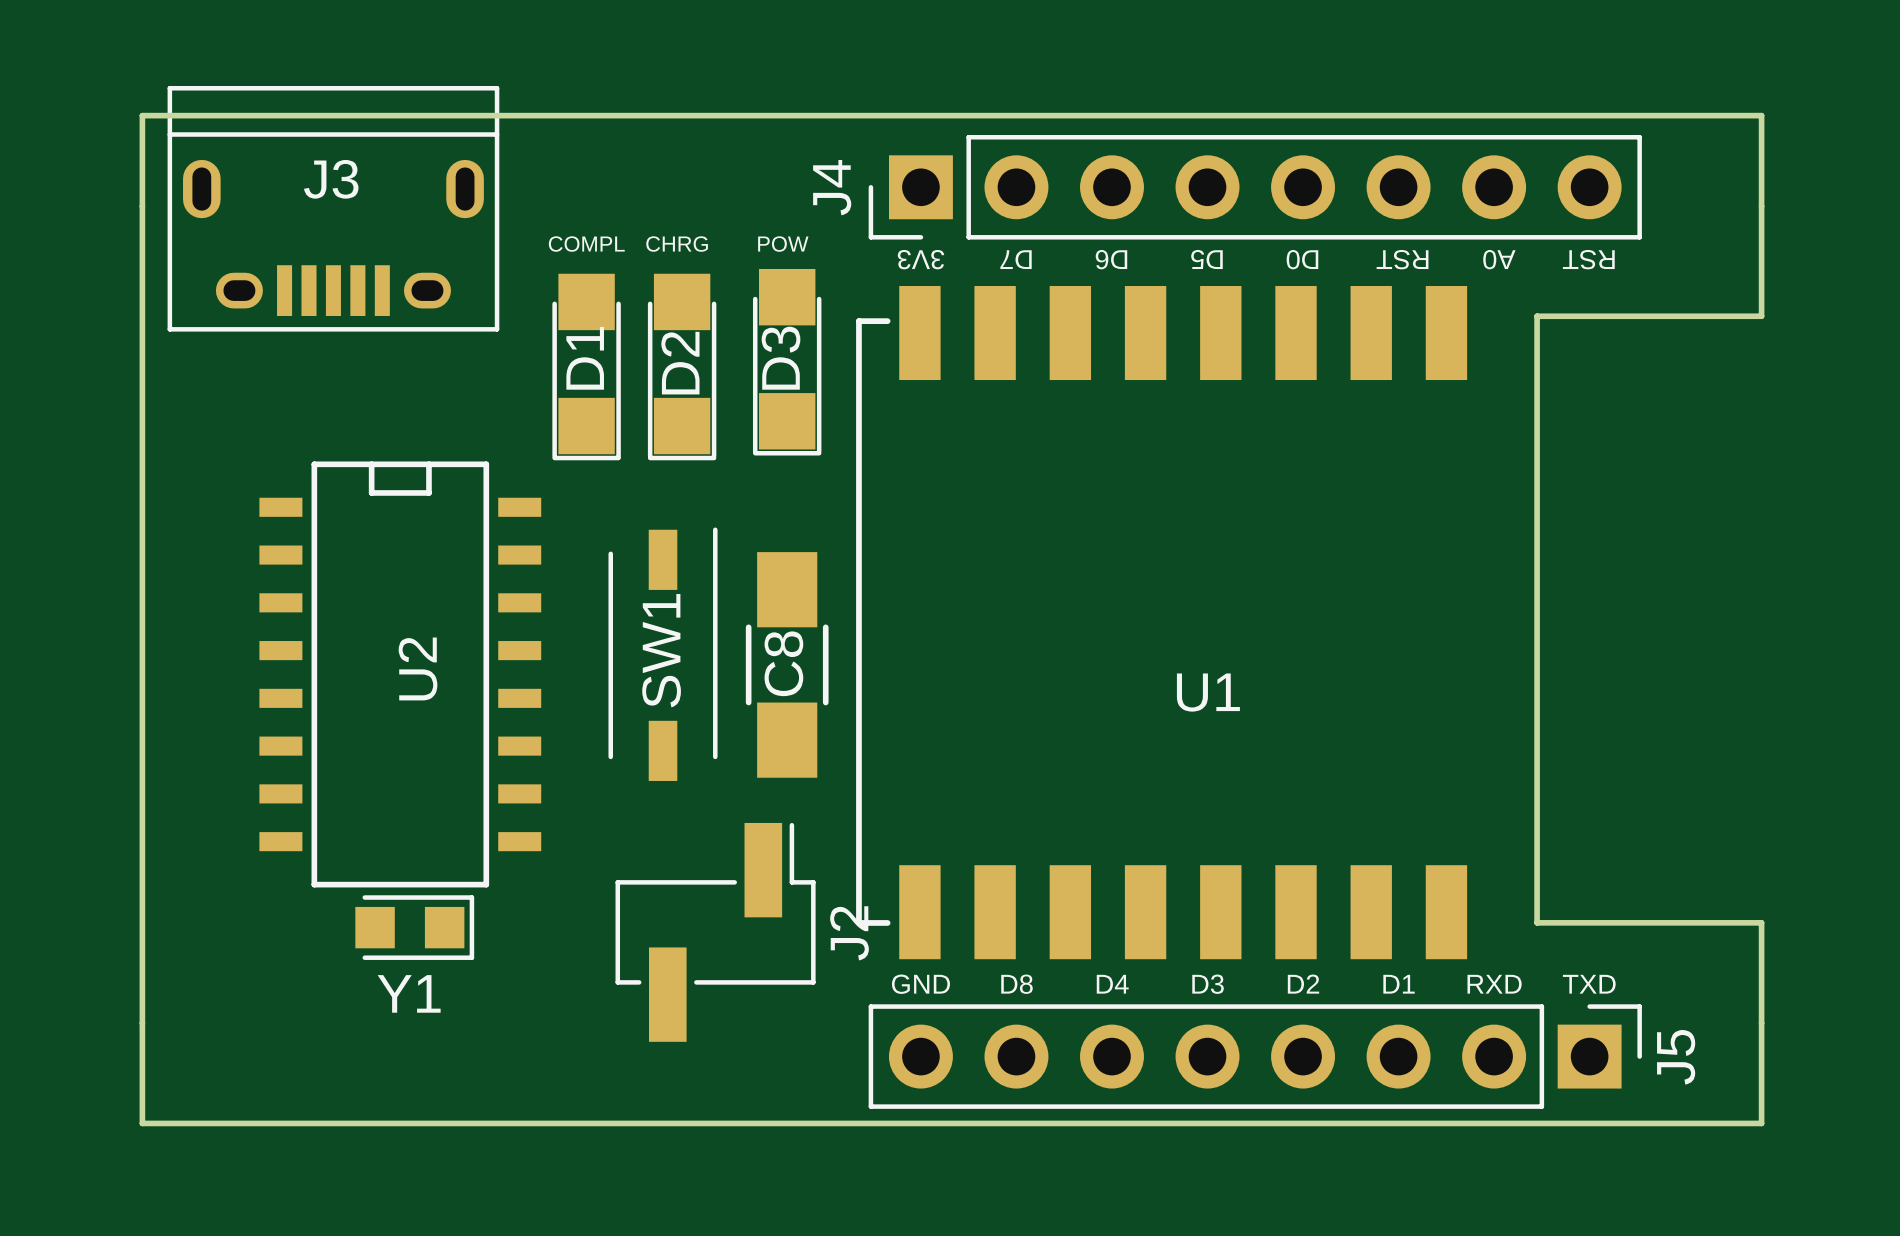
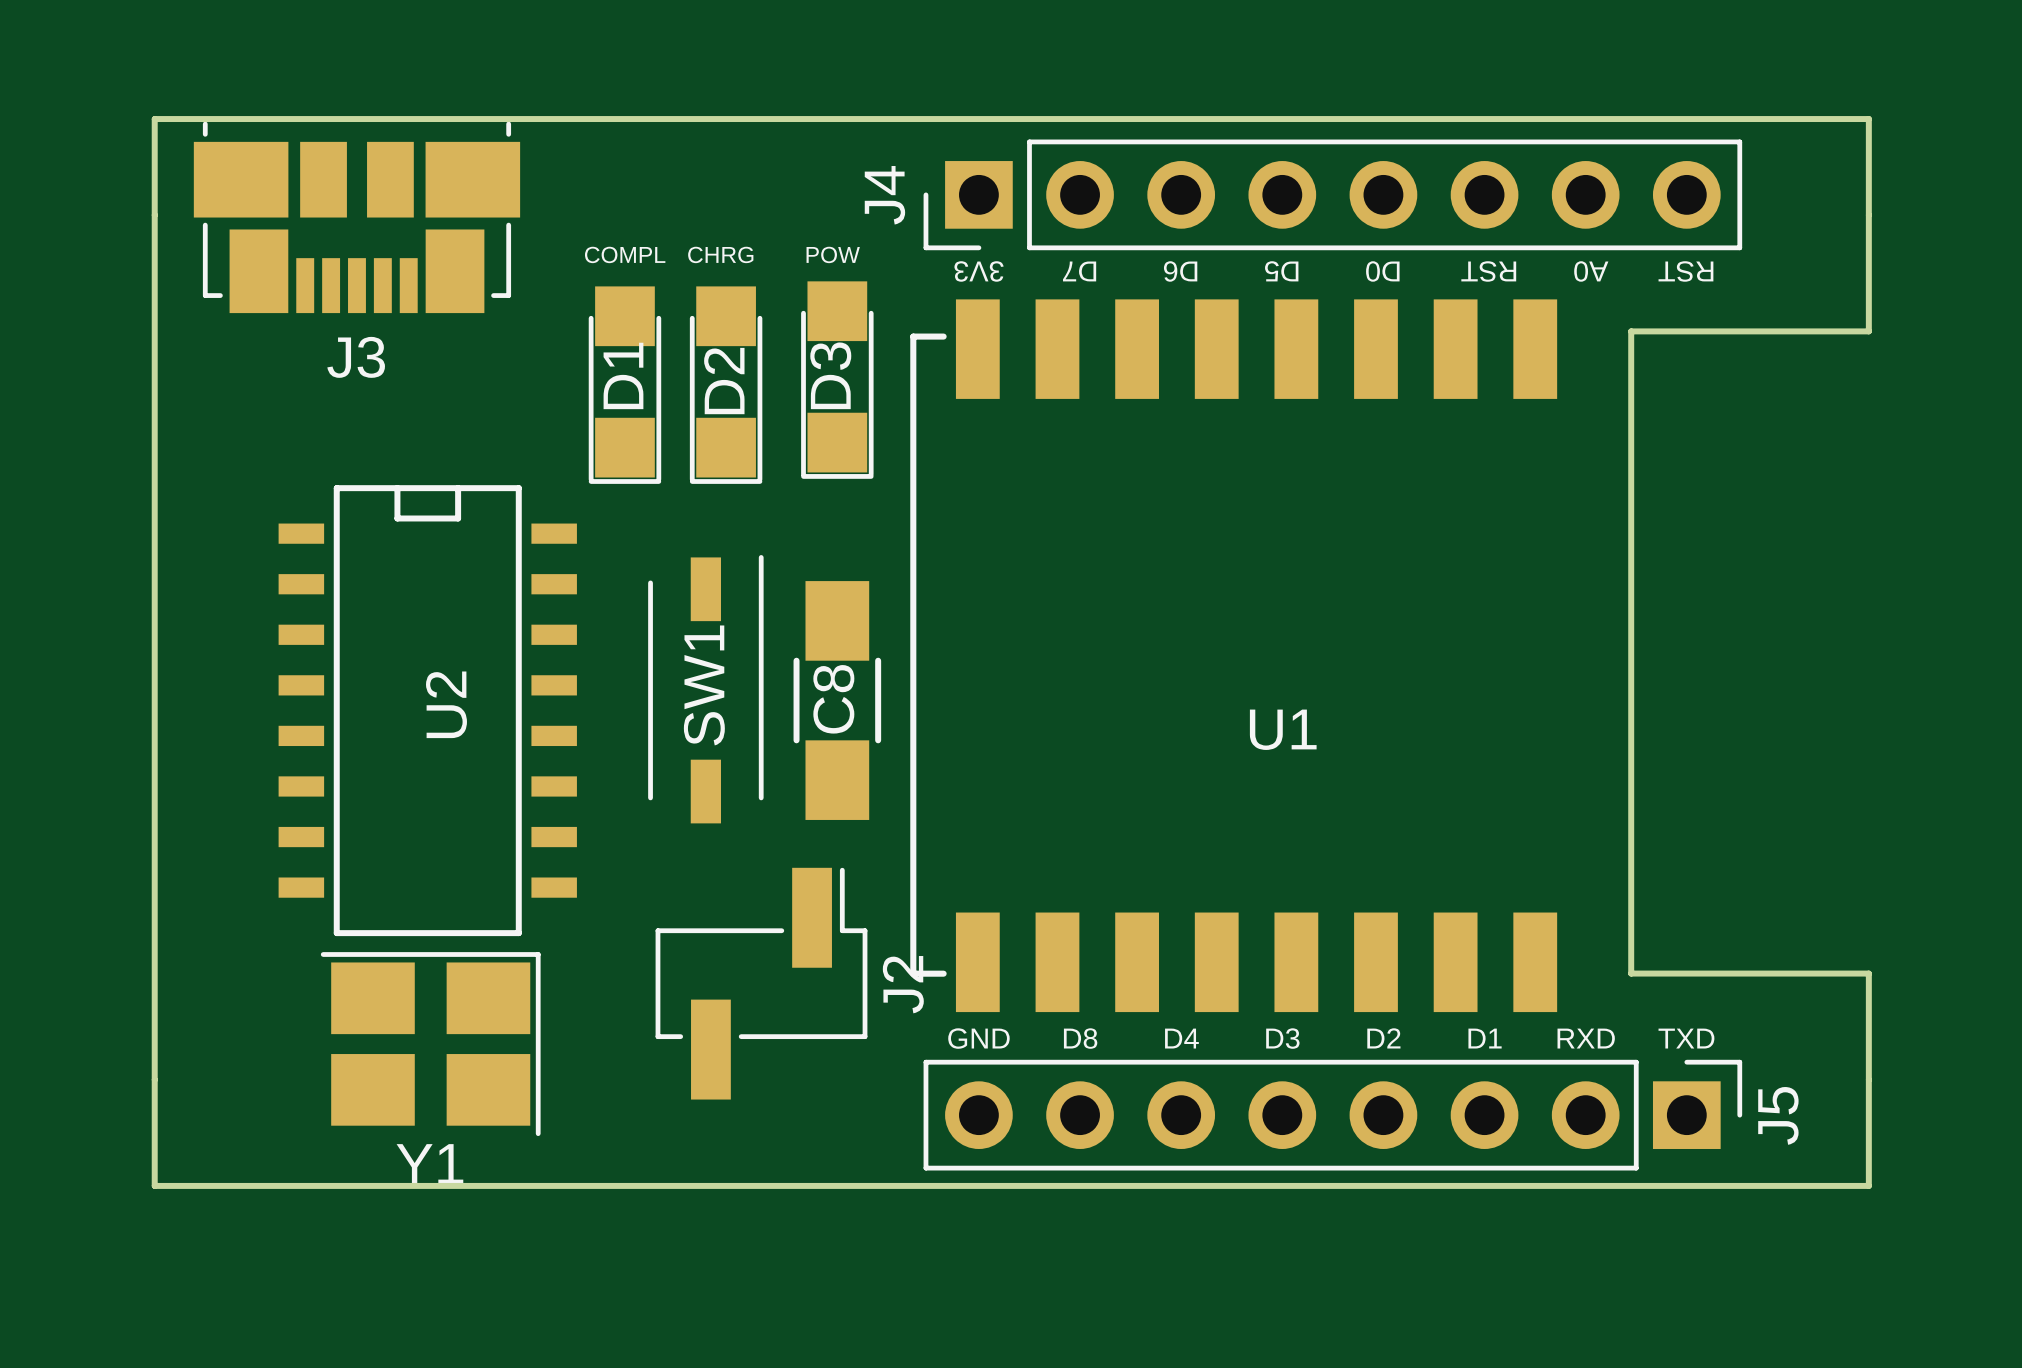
J3 footprint: [167, 86, 500, 332] -> [193, 121, 521, 314]
J3 name position: J3 (331, 179) -> J3 (356, 357)
Y1 footprint: [355, 895, 475, 960] -> [320, 952, 541, 1137]

